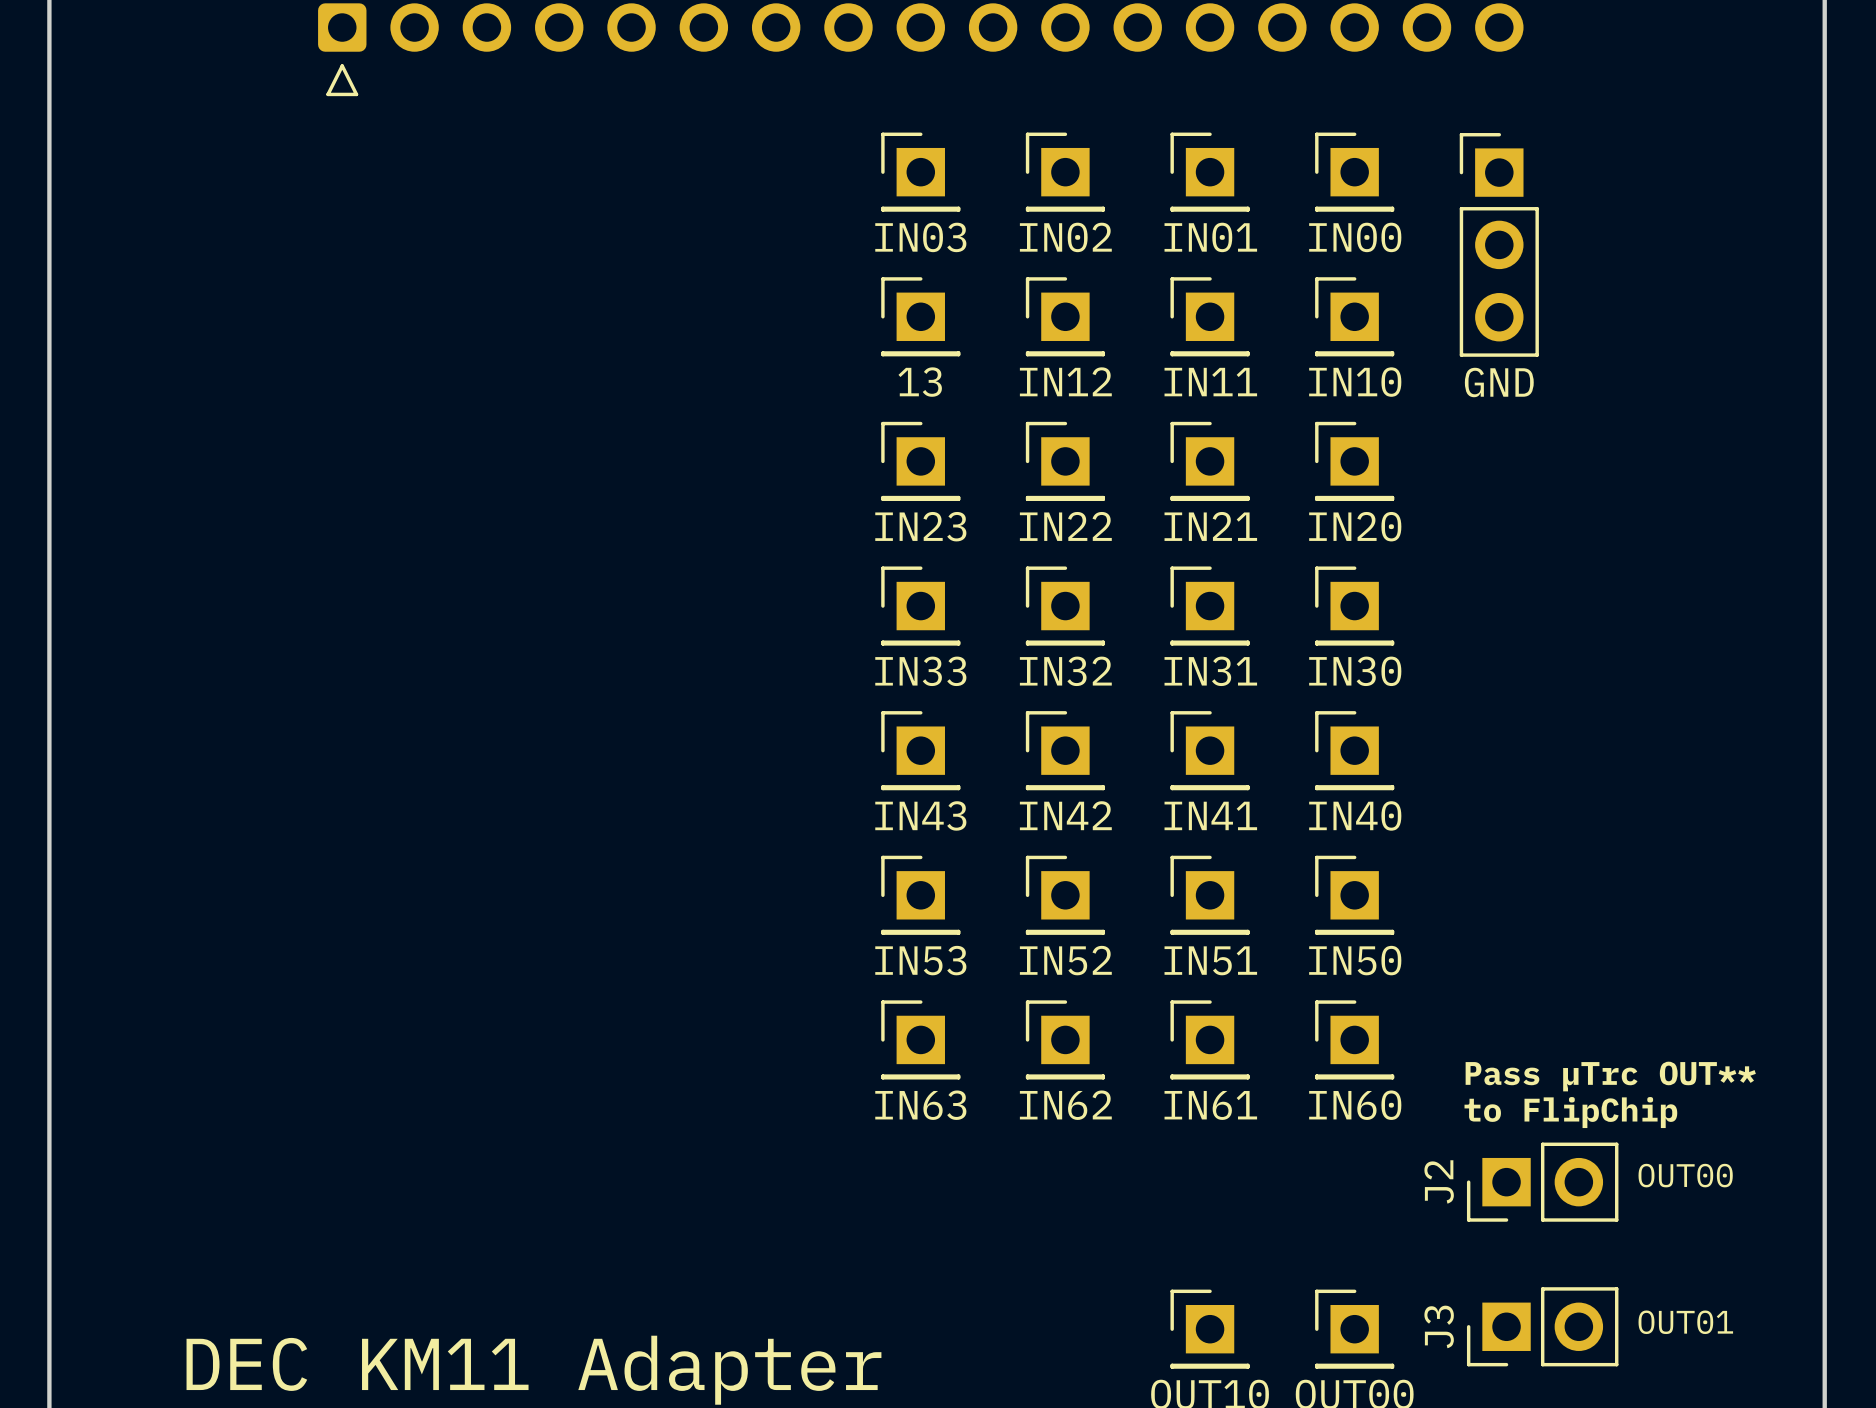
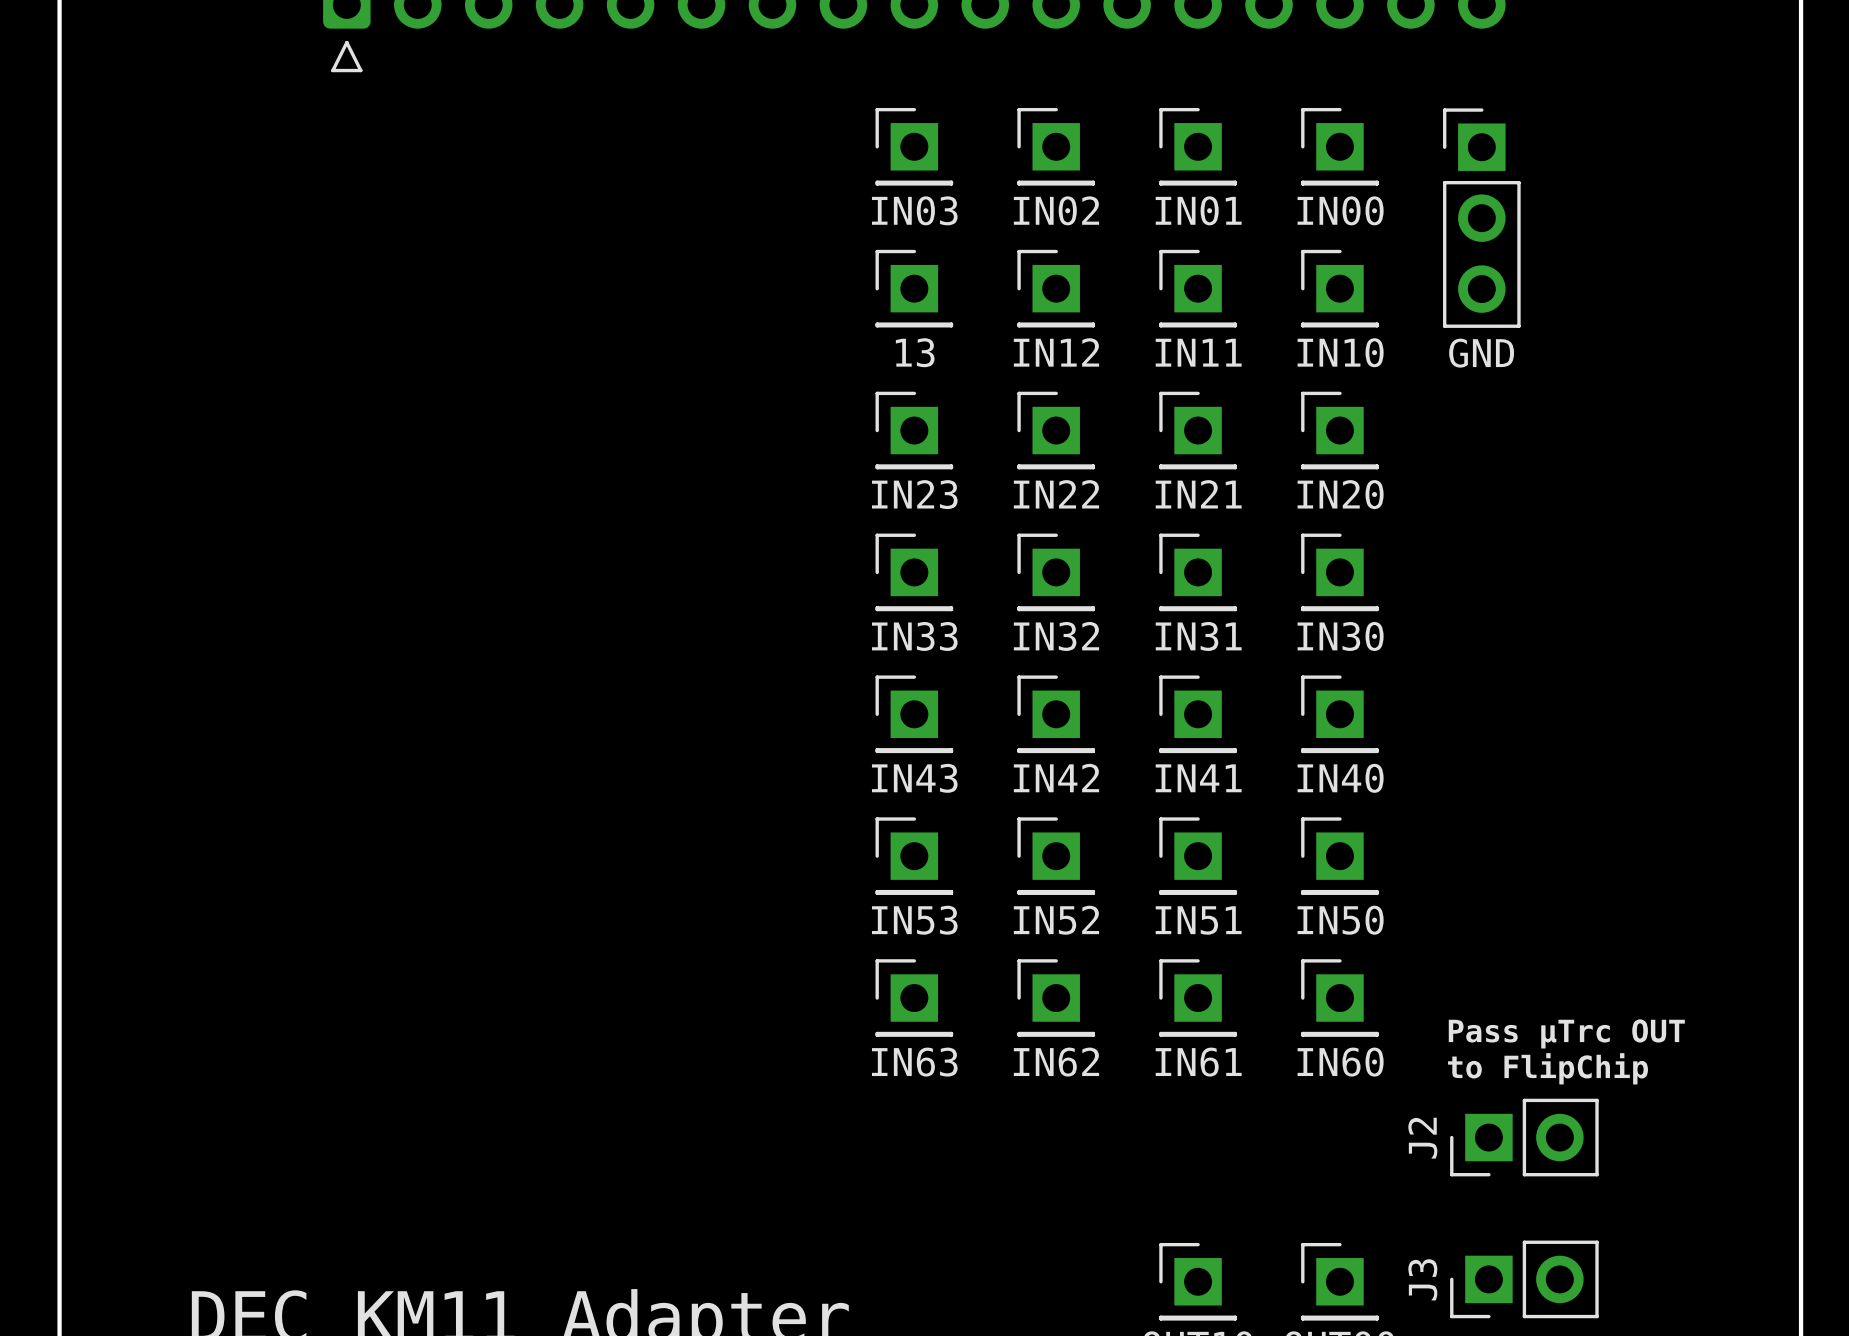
text: Pass µTrc OUT** (1610, 1076) -> Pass µTrc OUT (1566, 1033)
text: OUT00 (1685, 1175) -> none
text: OUT01 (1685, 1322) -> none

